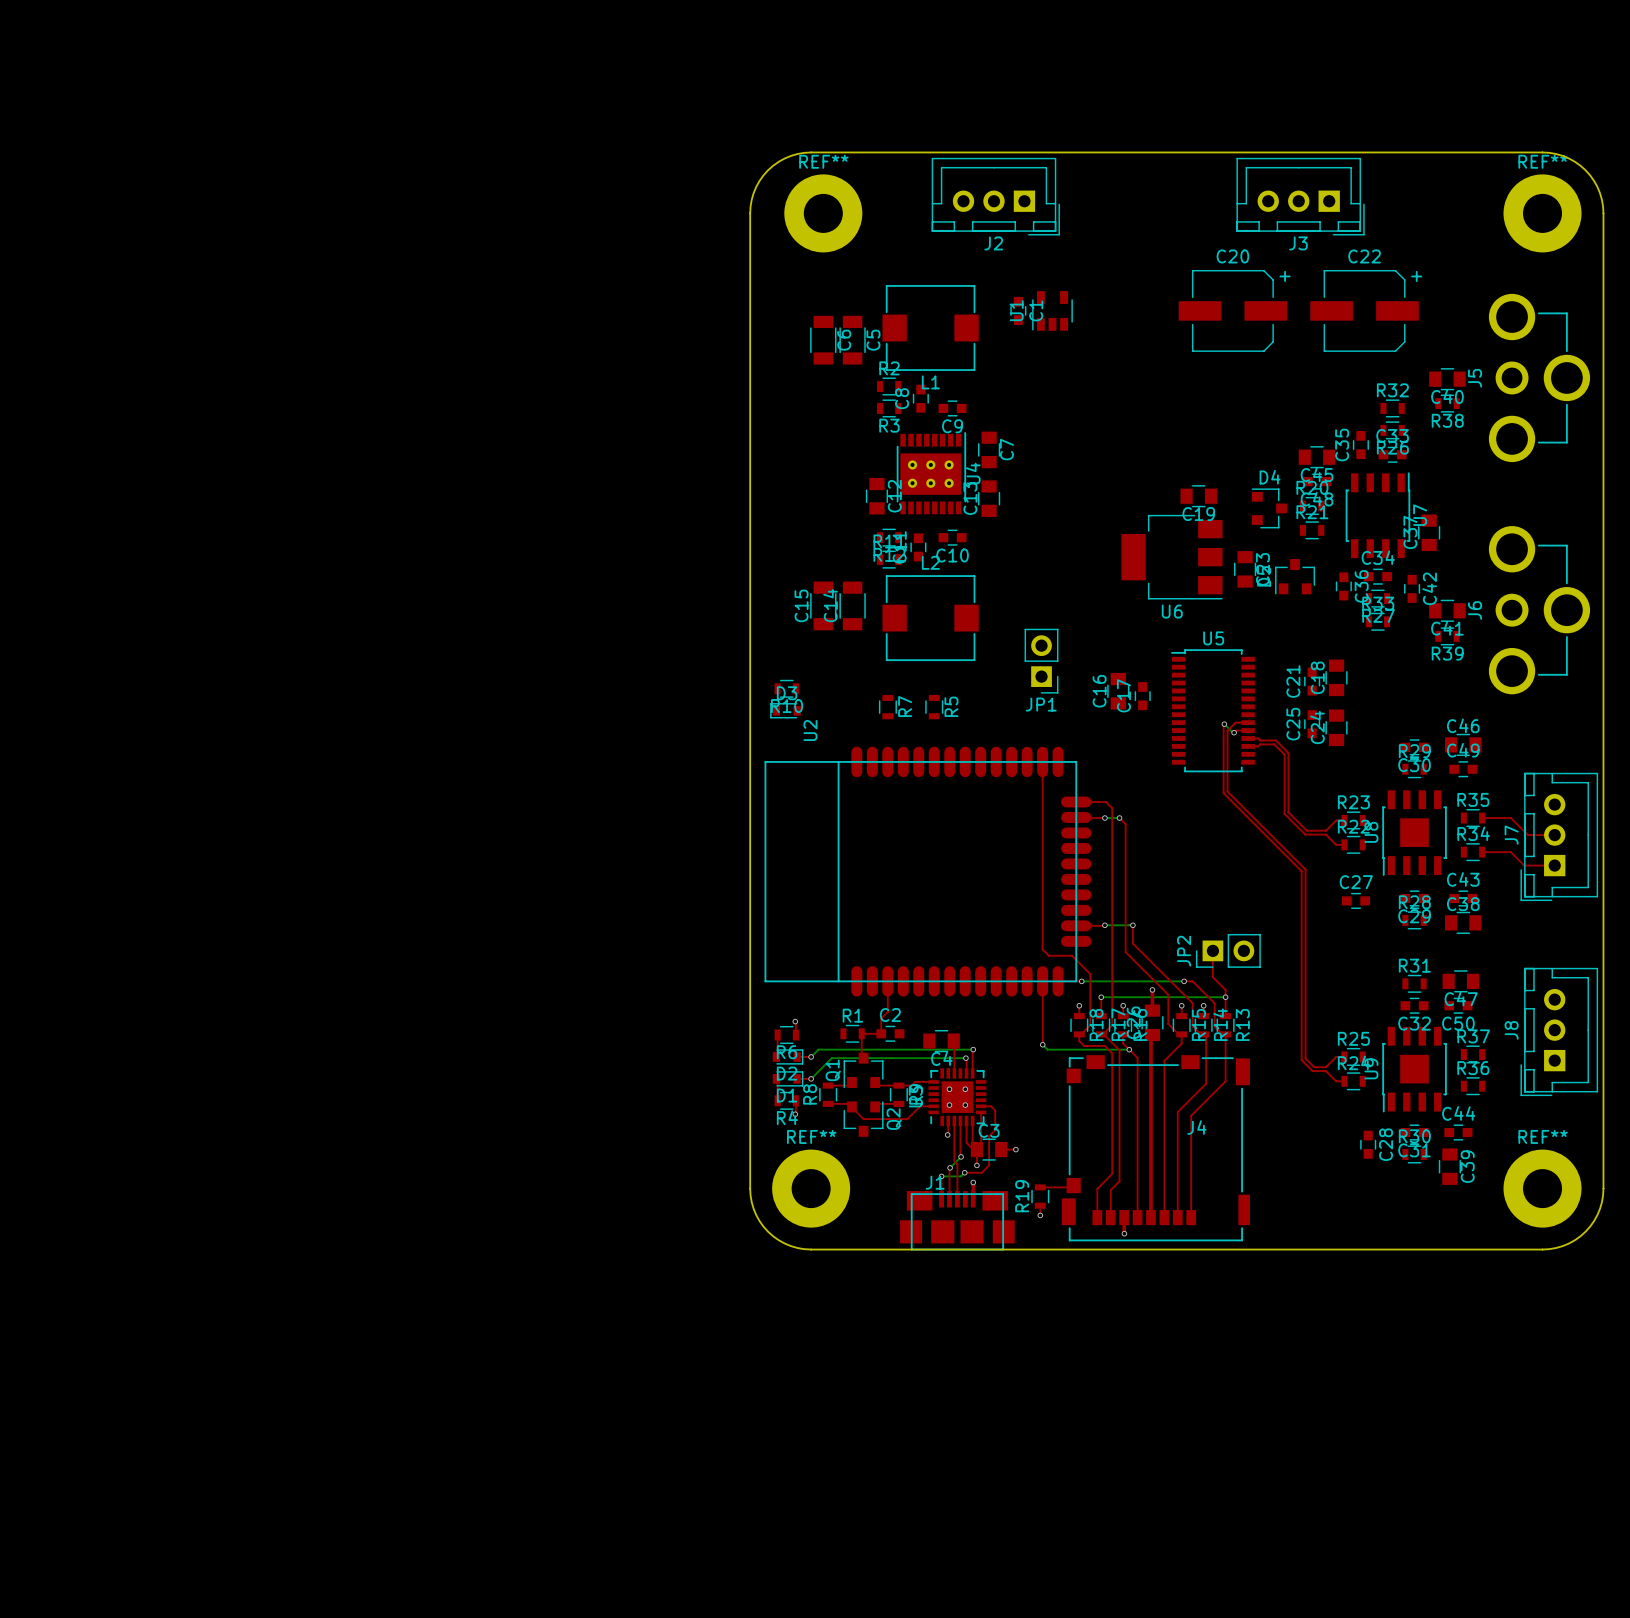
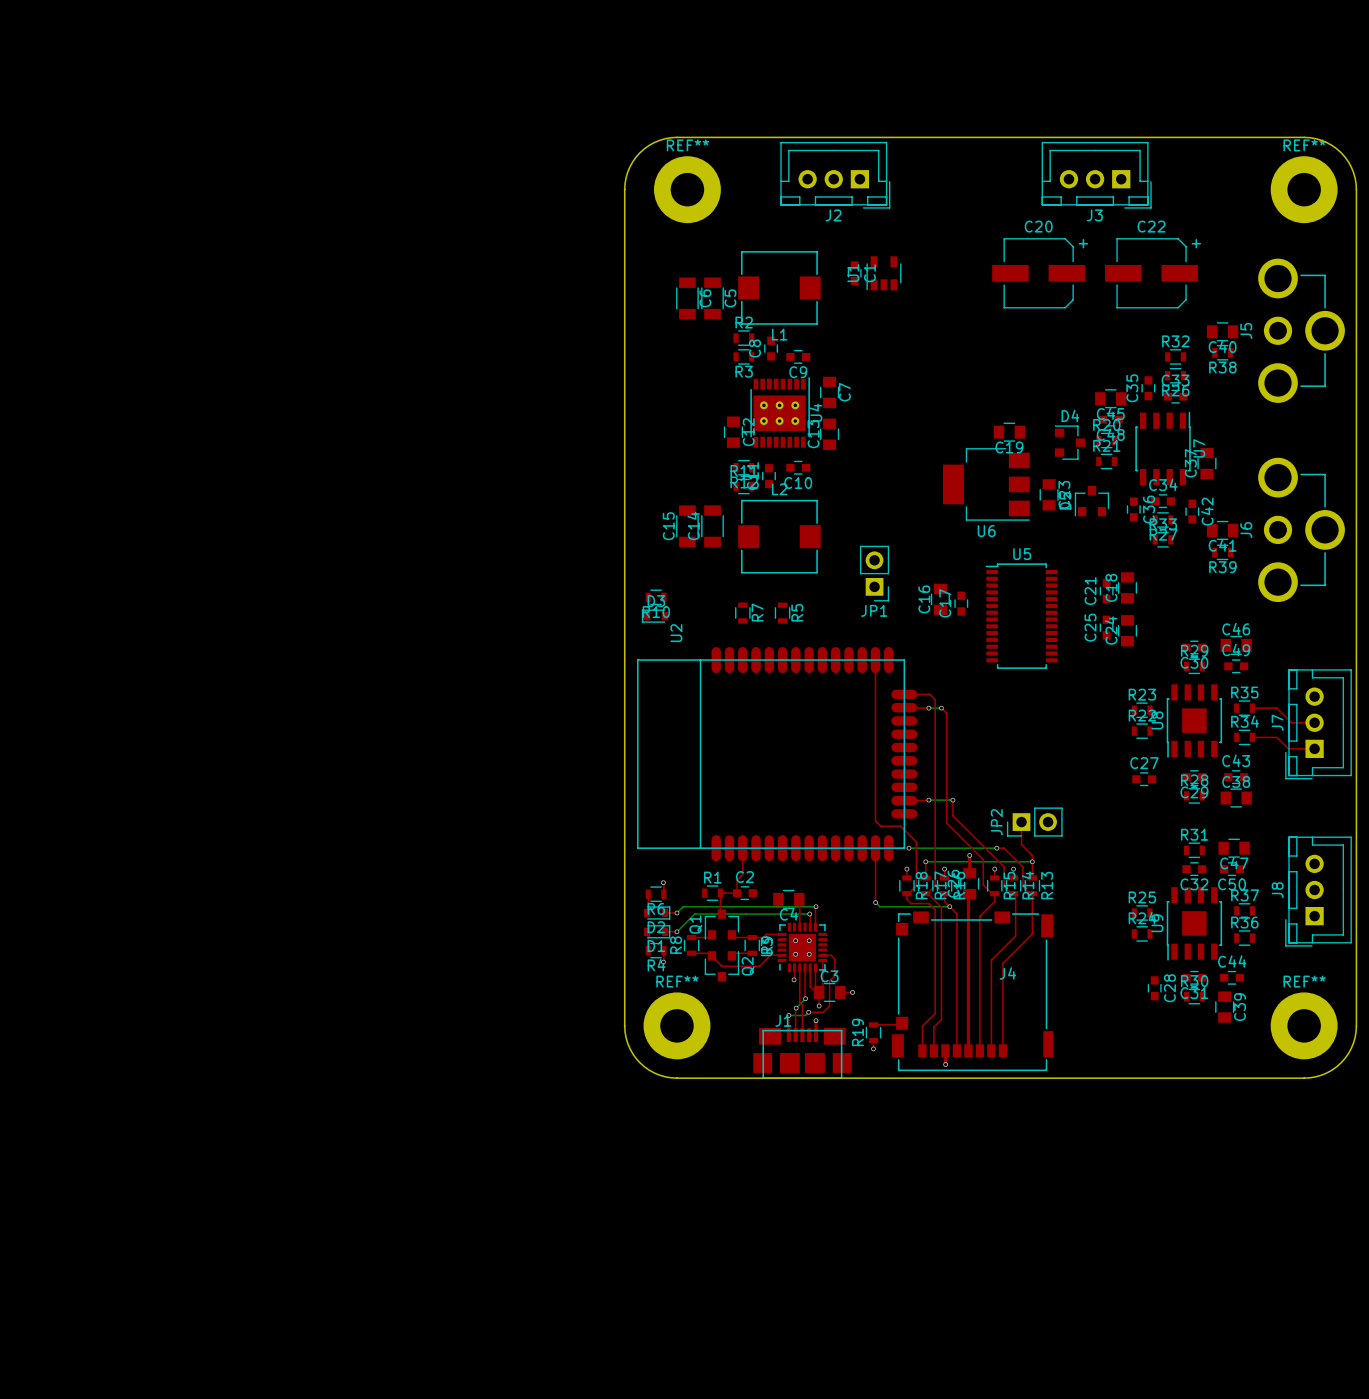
top track: (1248, 722) (1235, 722) (1227, 730) (1227, 791) (1305, 869) (1305, 1058) (1314, 1067) (1325, 1067) (1336, 1056) (1344, 1056) -> none
top track: (1224, 724) (1223, 793) (1301, 871) (1301, 1060) (1312, 1071) (1325, 1071) (1336, 1081) (1344, 1081) -> none
bottom track: (1224, 724) (1234, 732) -> none
via: (1224, 724) -> none
top track: (1248, 730) (1236, 730) (1234, 732) -> none
via: (1234, 732) -> none
top track: (1248, 738) (1275, 740) (1288, 753) (1288, 812) (1306, 830) (1325, 830) (1336, 820) (1344, 820) -> none
top track: (1248, 746) (1274, 744) (1284, 754) (1284, 813) (1305, 834) (1325, 834) (1336, 844) (1344, 844) -> none

